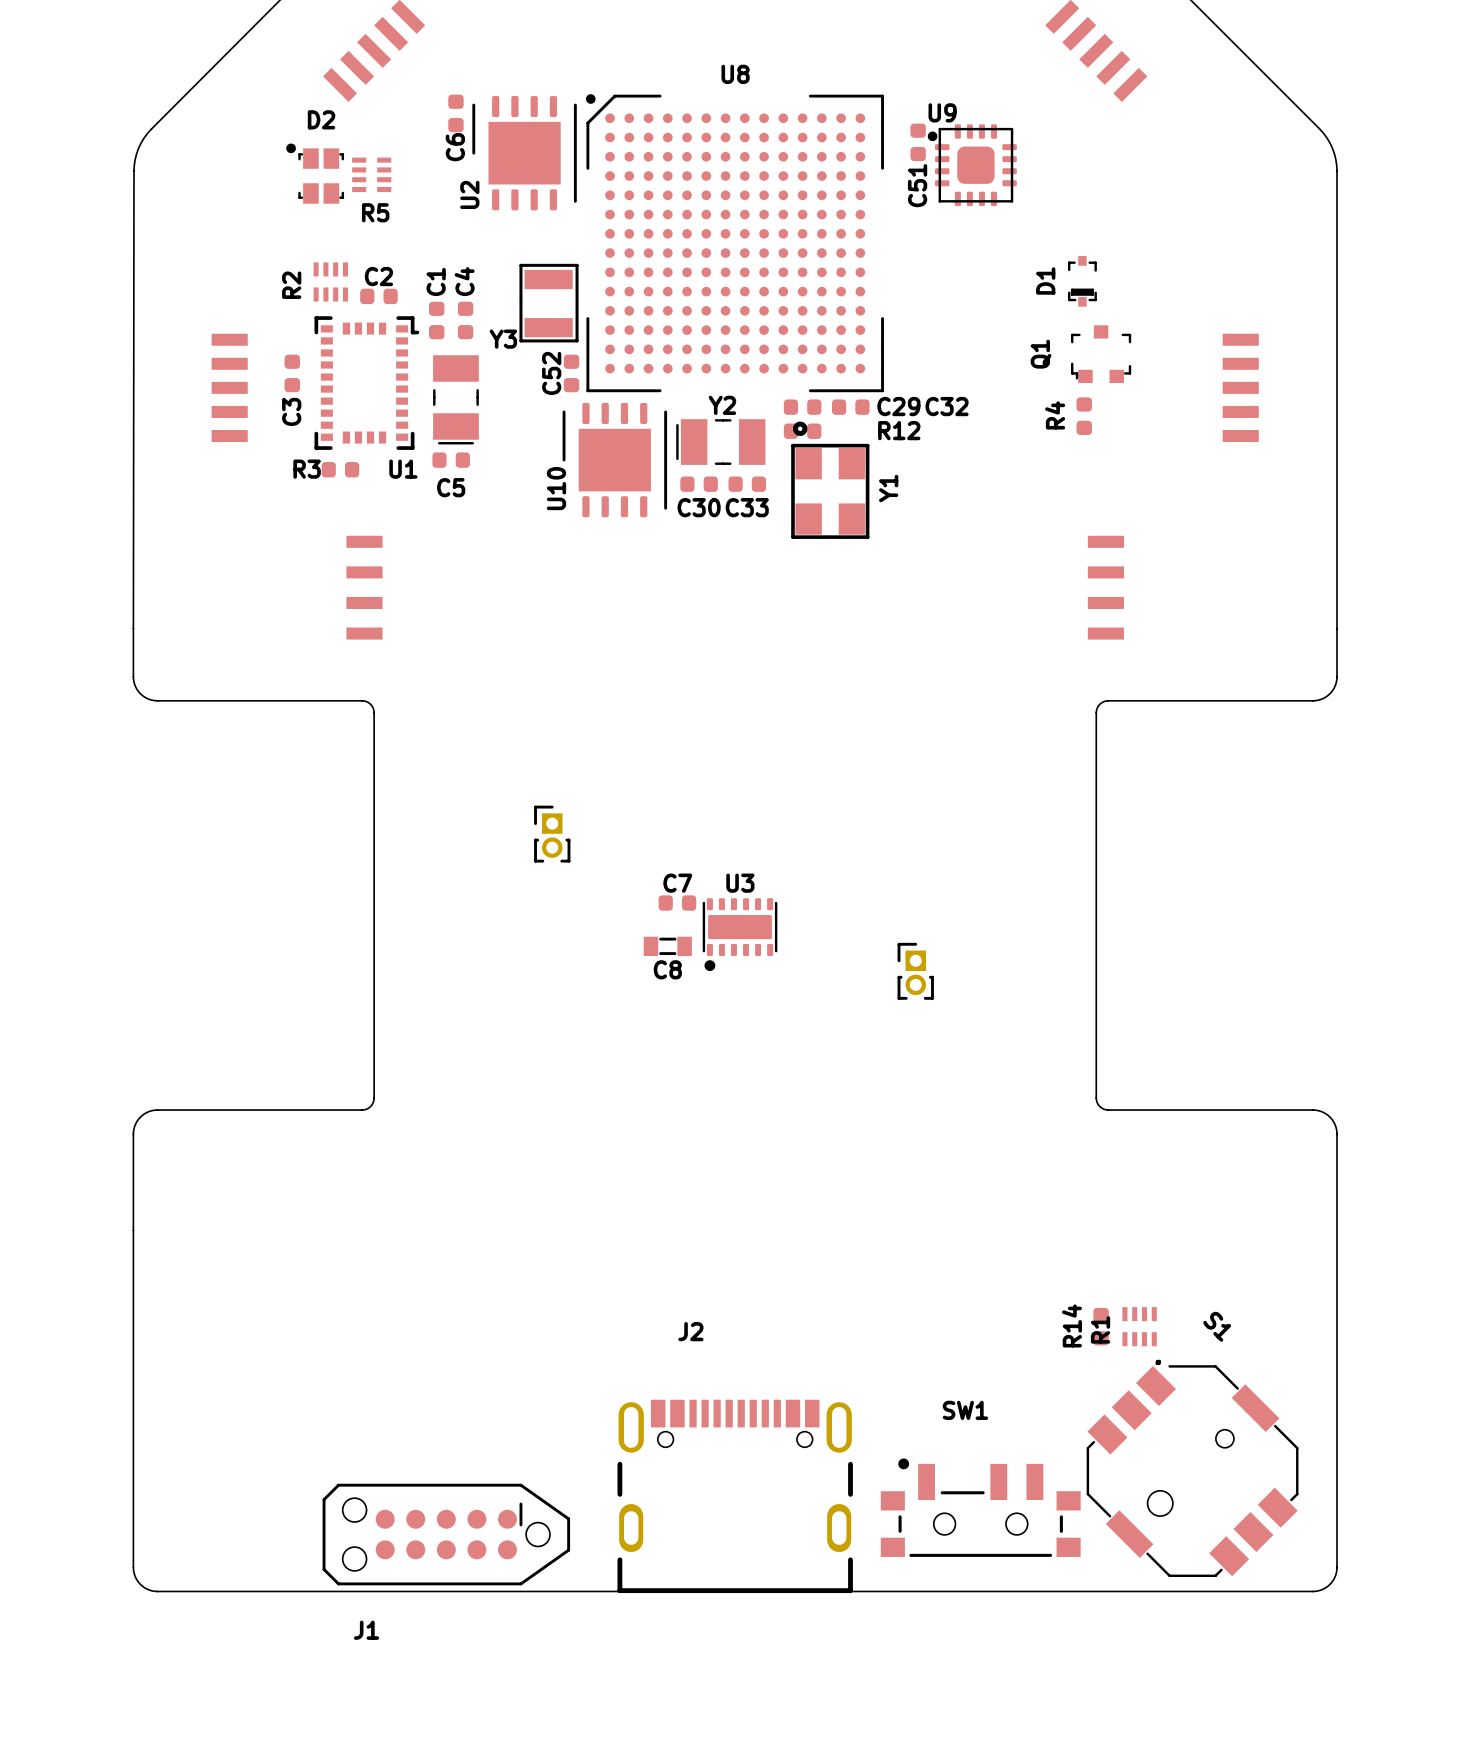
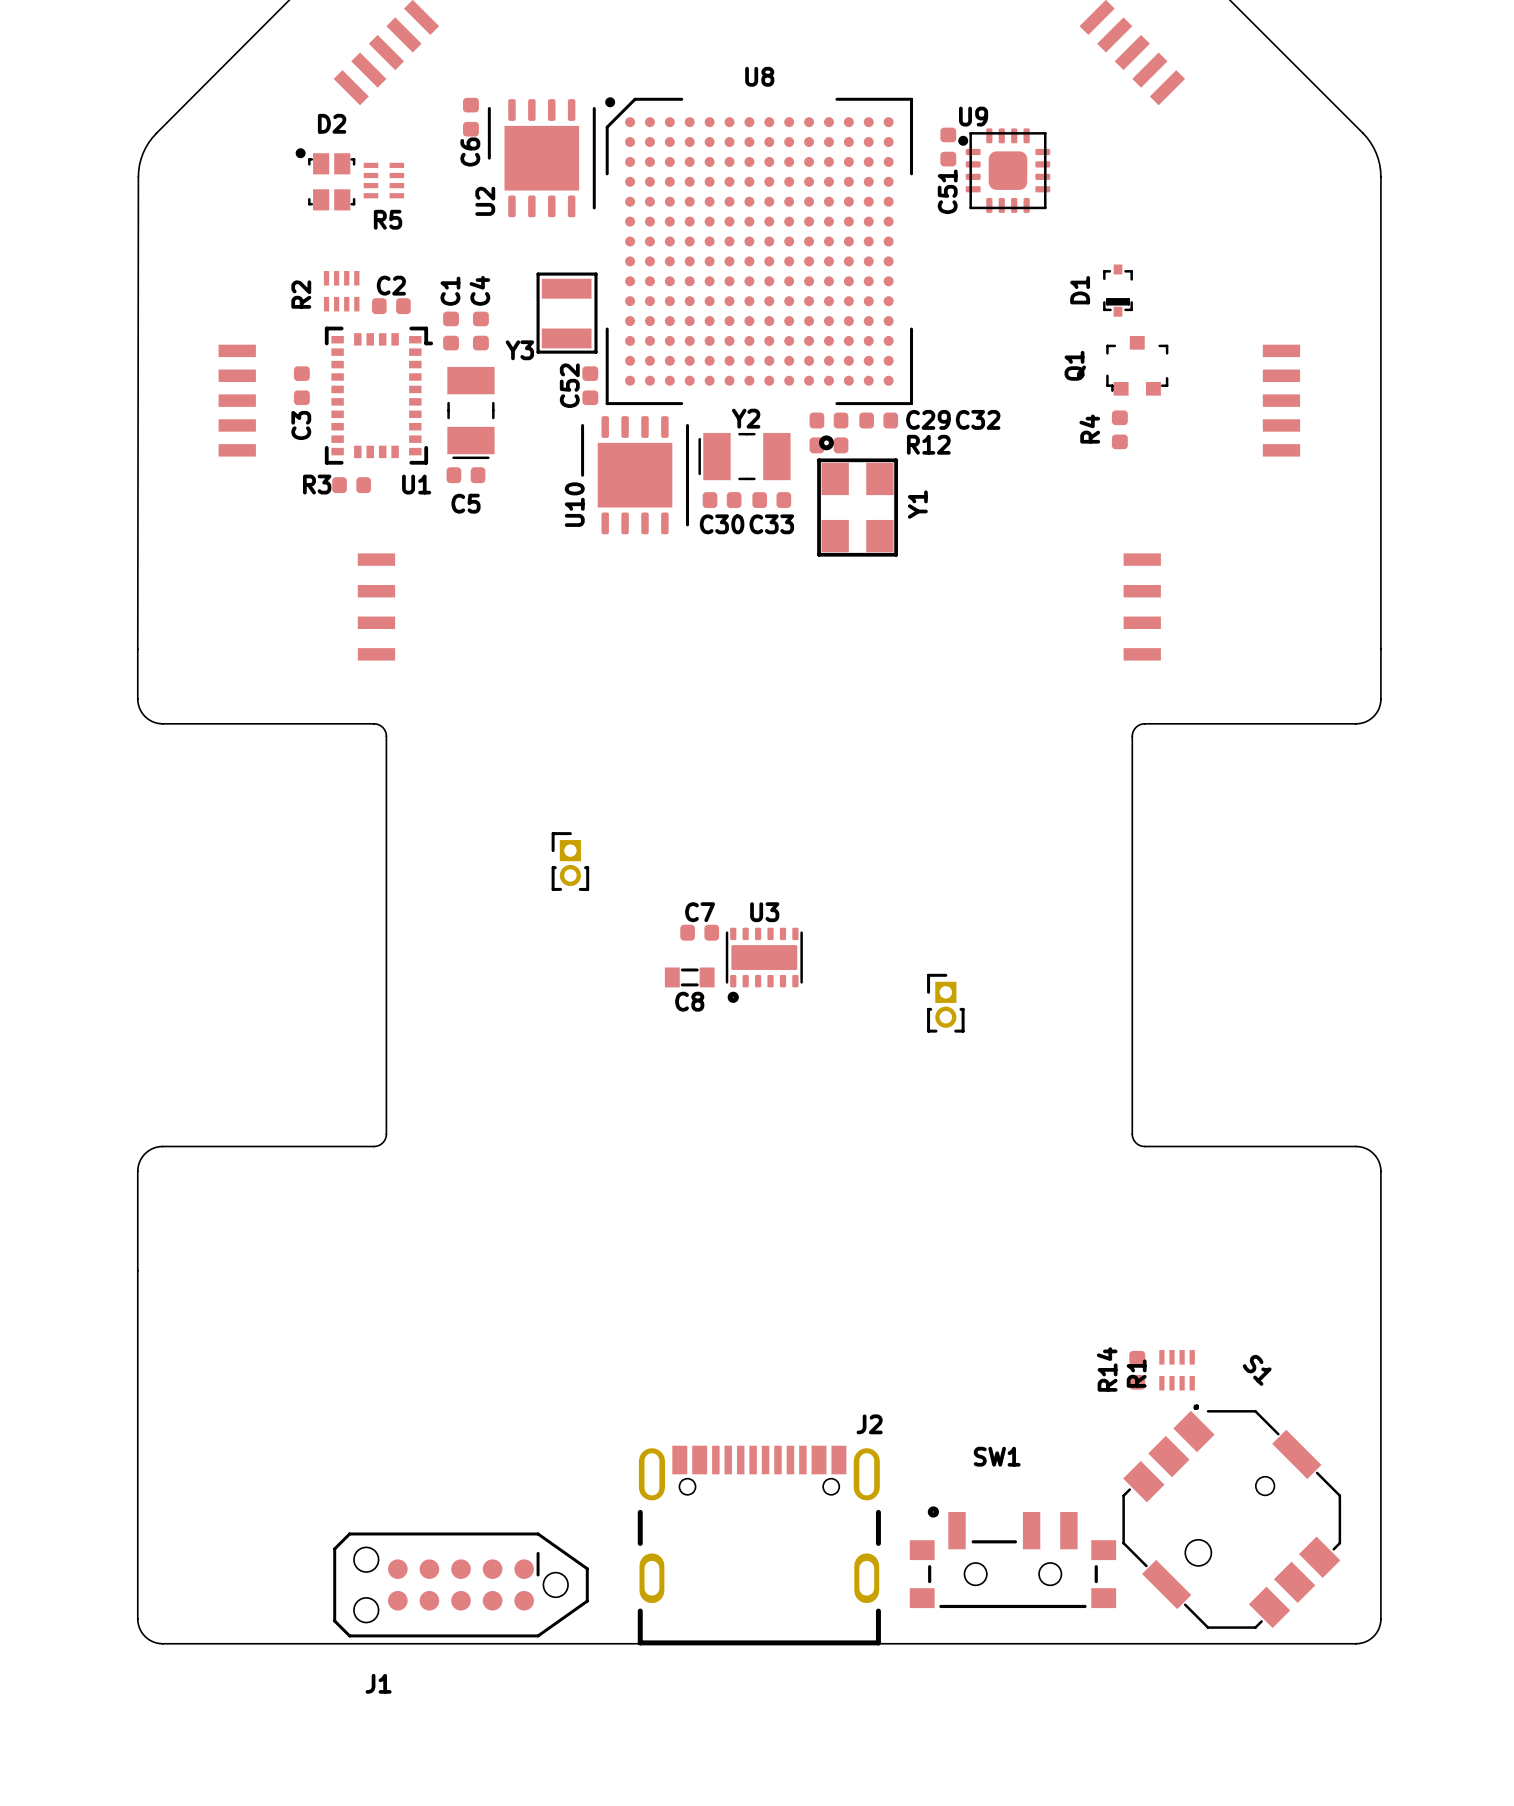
J2 name position: J2 (690, 1331) -> J2 (869, 1424)

